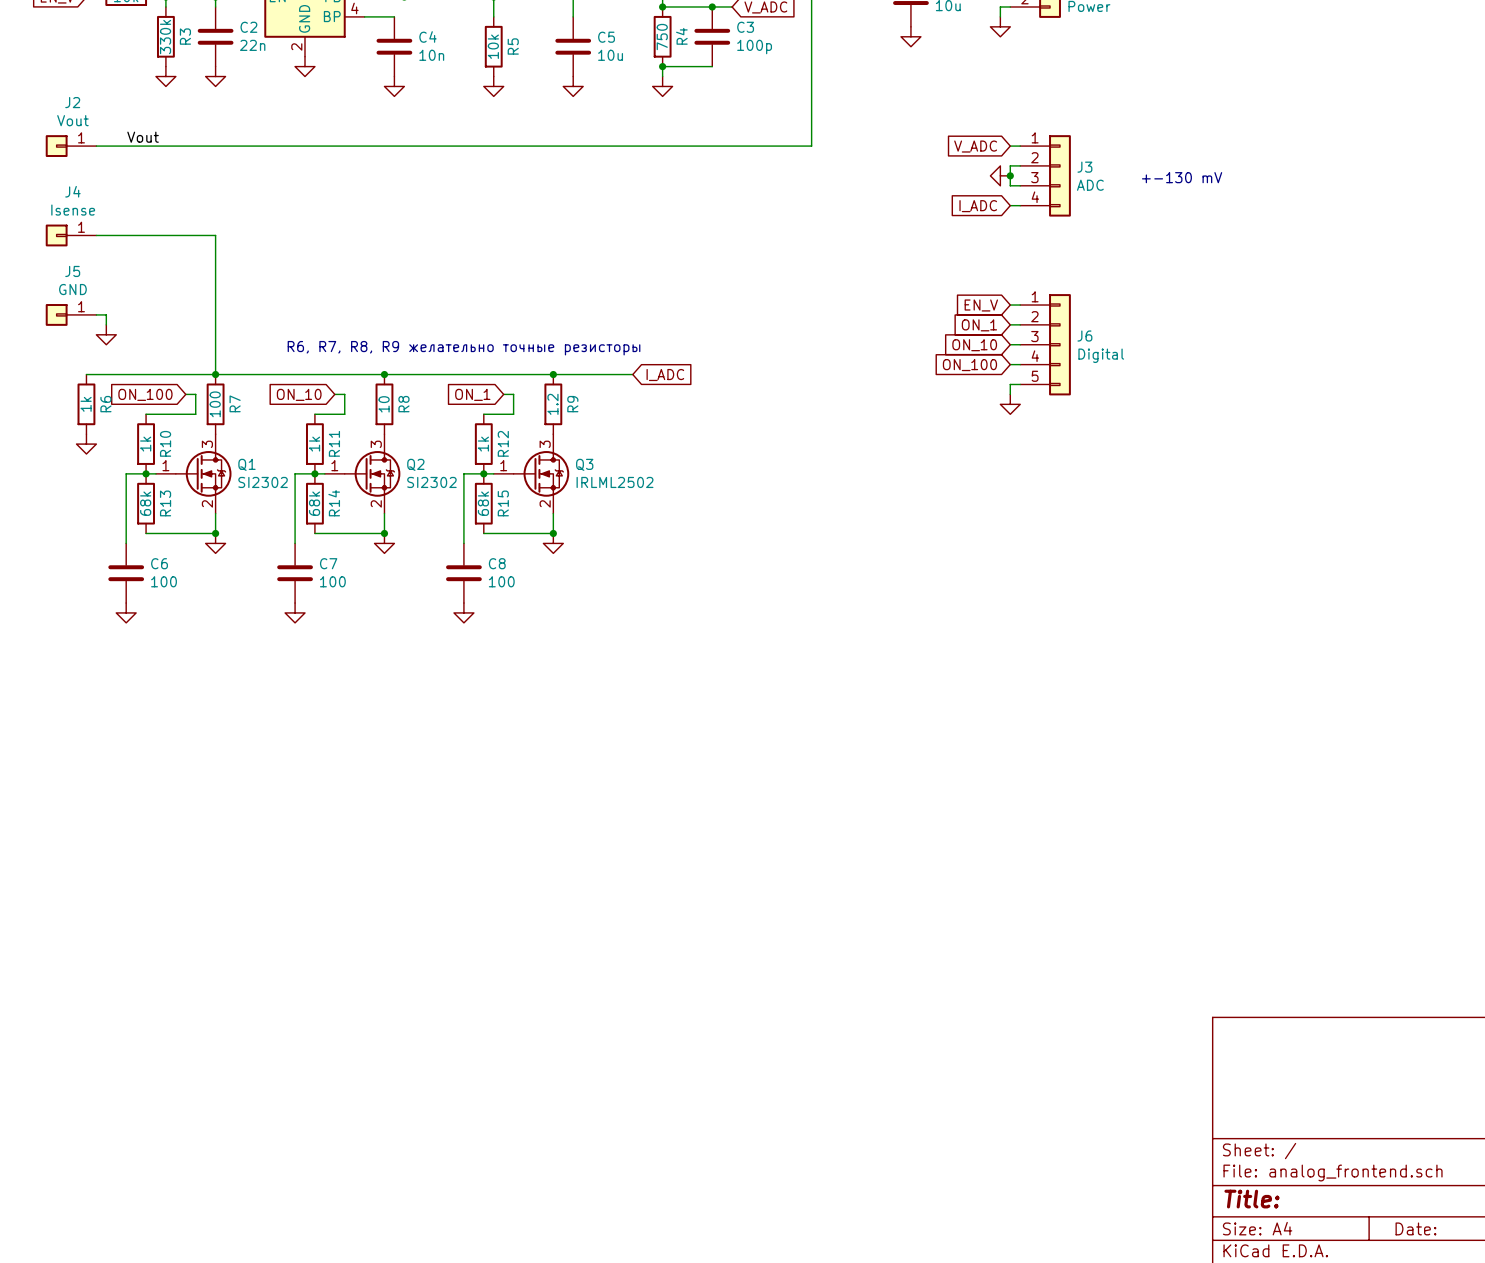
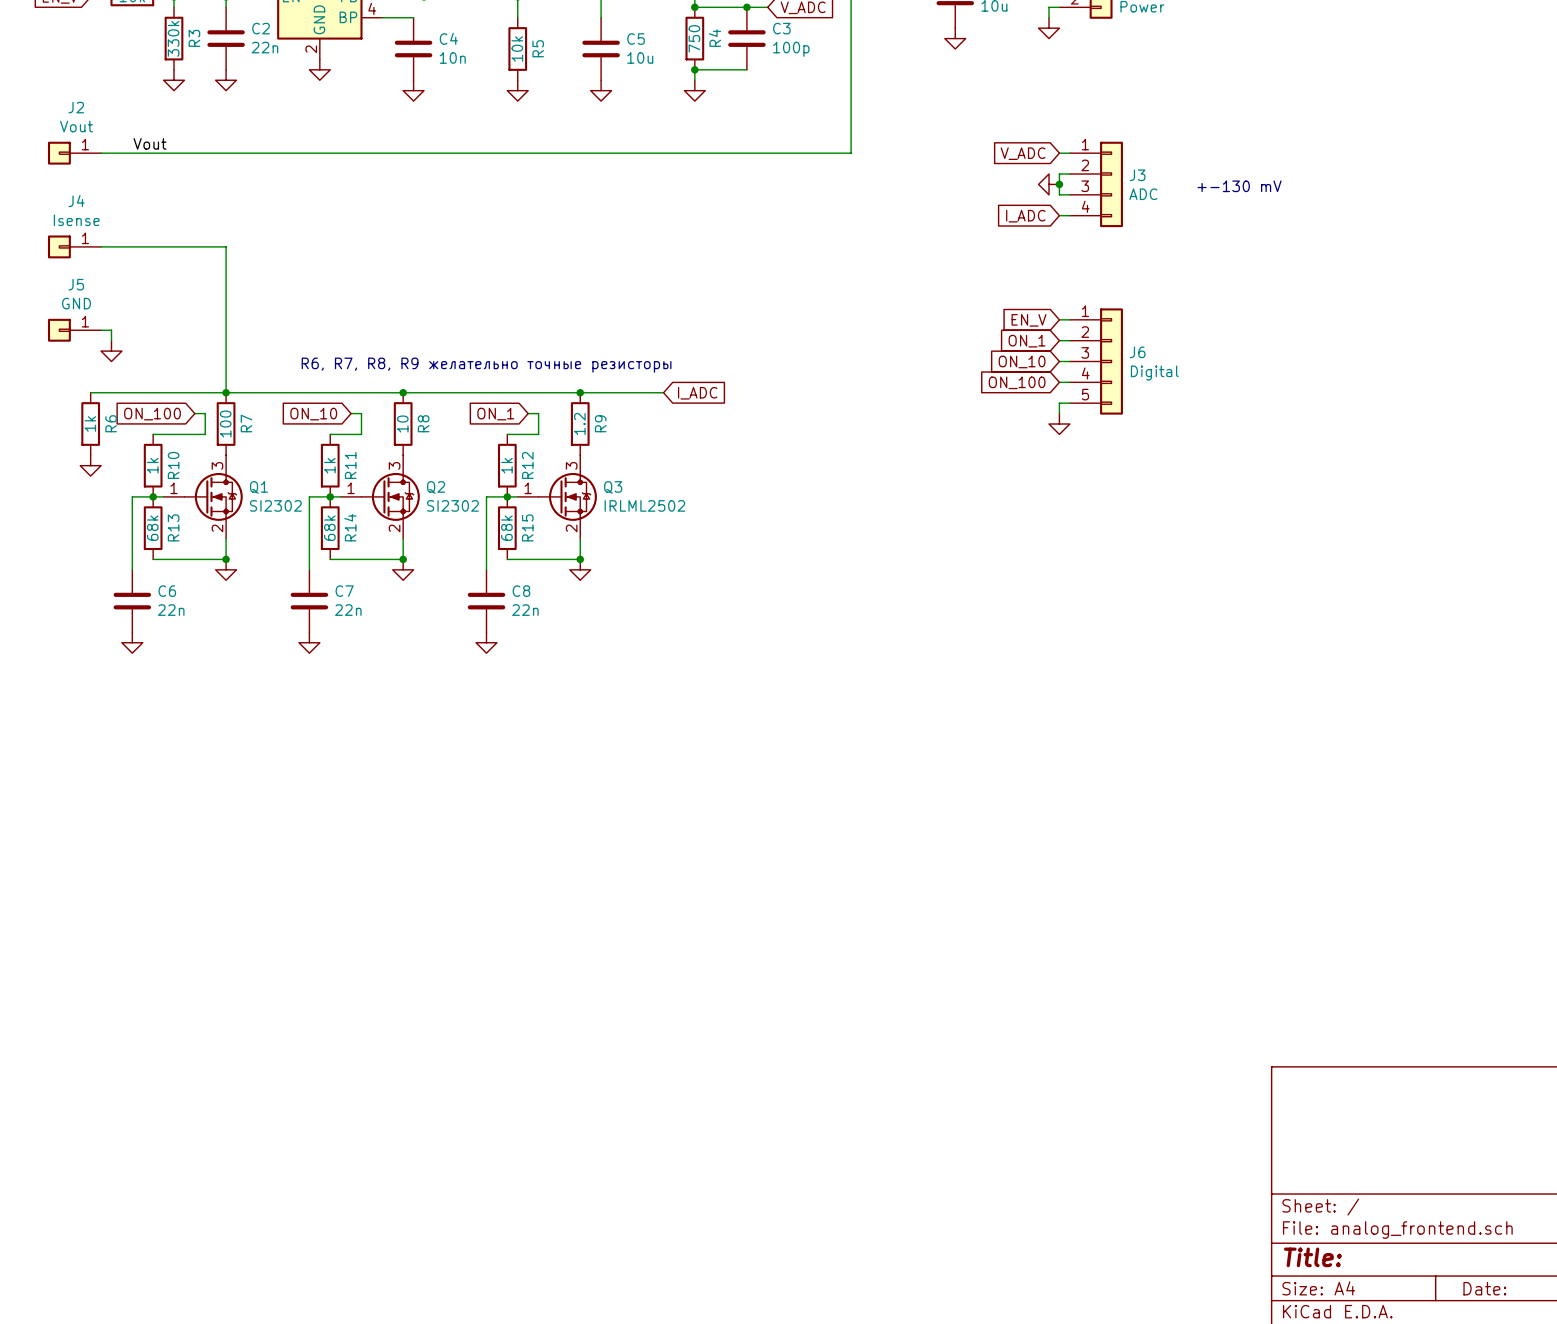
C6 value: 100 (164, 581) -> 22n (171, 610)
C7 value: 100 (332, 581) -> 22n (348, 610)
C8 value: 100 (501, 581) -> 22n (525, 610)

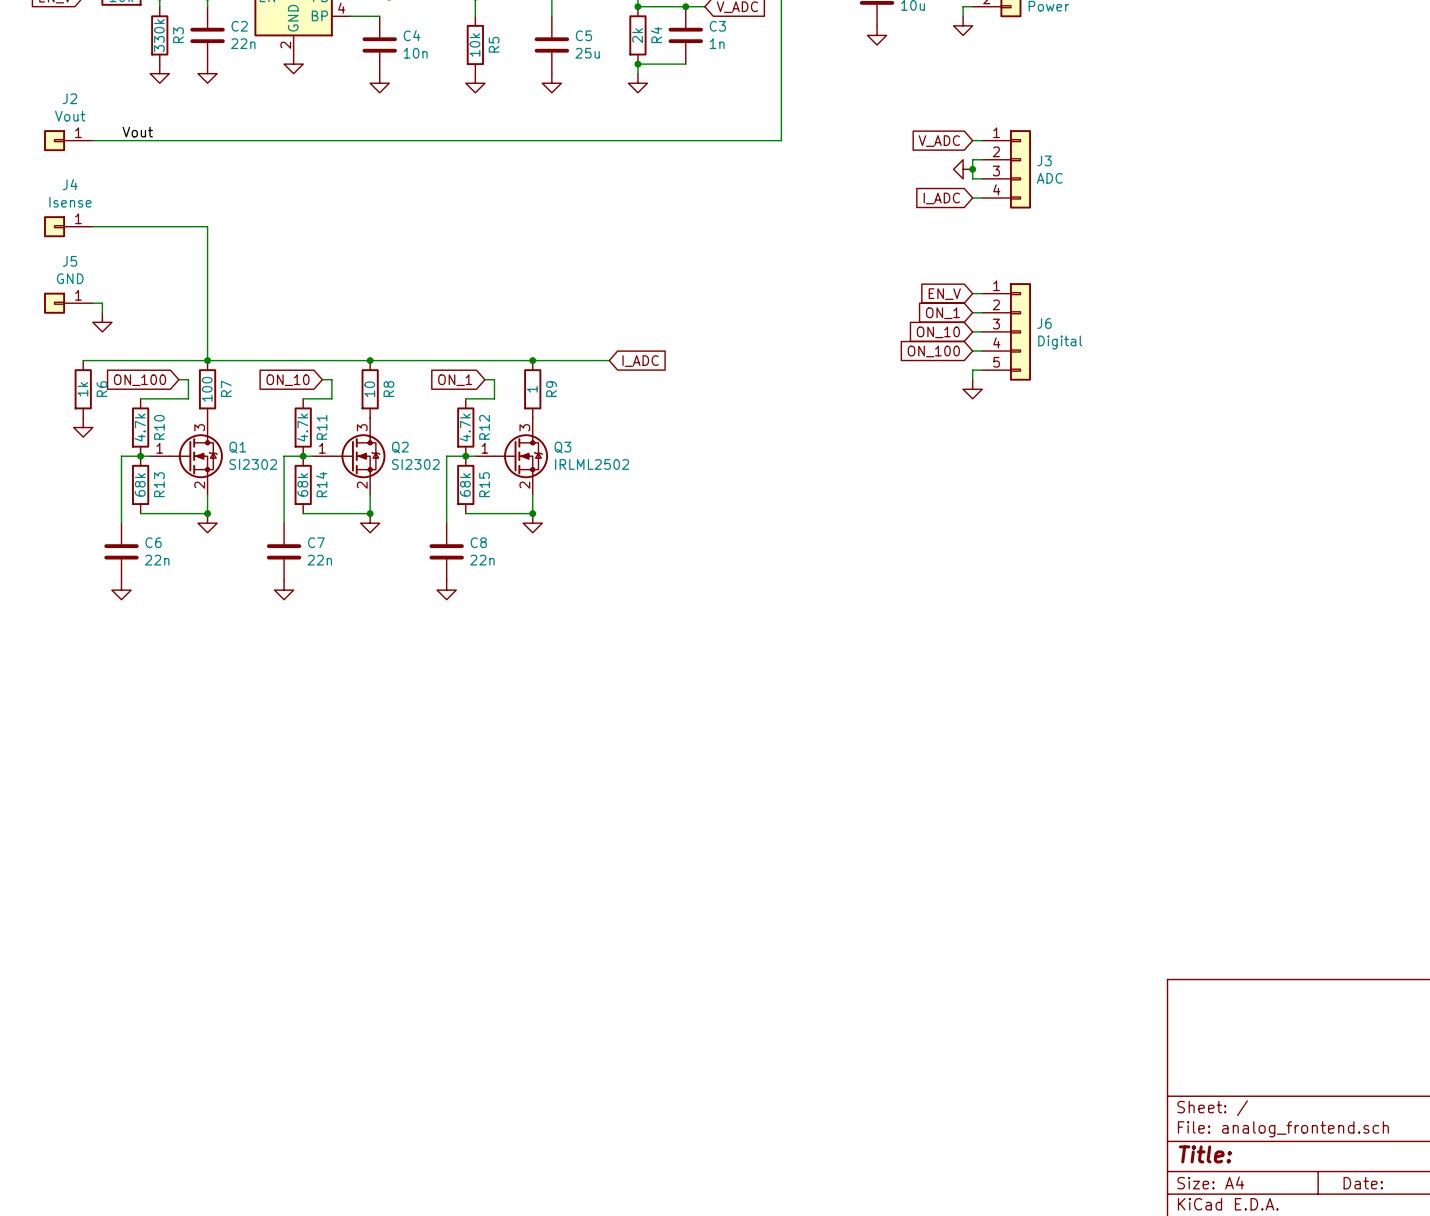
R4 value: 750 (694, 38) -> 2k (637, 35)
C3 value: 100p (791, 49) -> 1n (717, 43)
C5 value: 10u (640, 57) -> 25u (587, 53)
text: +-130 mV (1239, 186) -> none
text: R6, R7, R8, R9 желательно точные резисторы (486, 365) -> none
R9 value: 1.2 (579, 424) -> 1 (532, 389)
R10 value: 1k (152, 465) -> 4.7k (140, 427)
R11 value: 1k (329, 465) -> 4.7k (302, 427)
R12 value: 1k (506, 465) -> 4.7k (465, 427)

